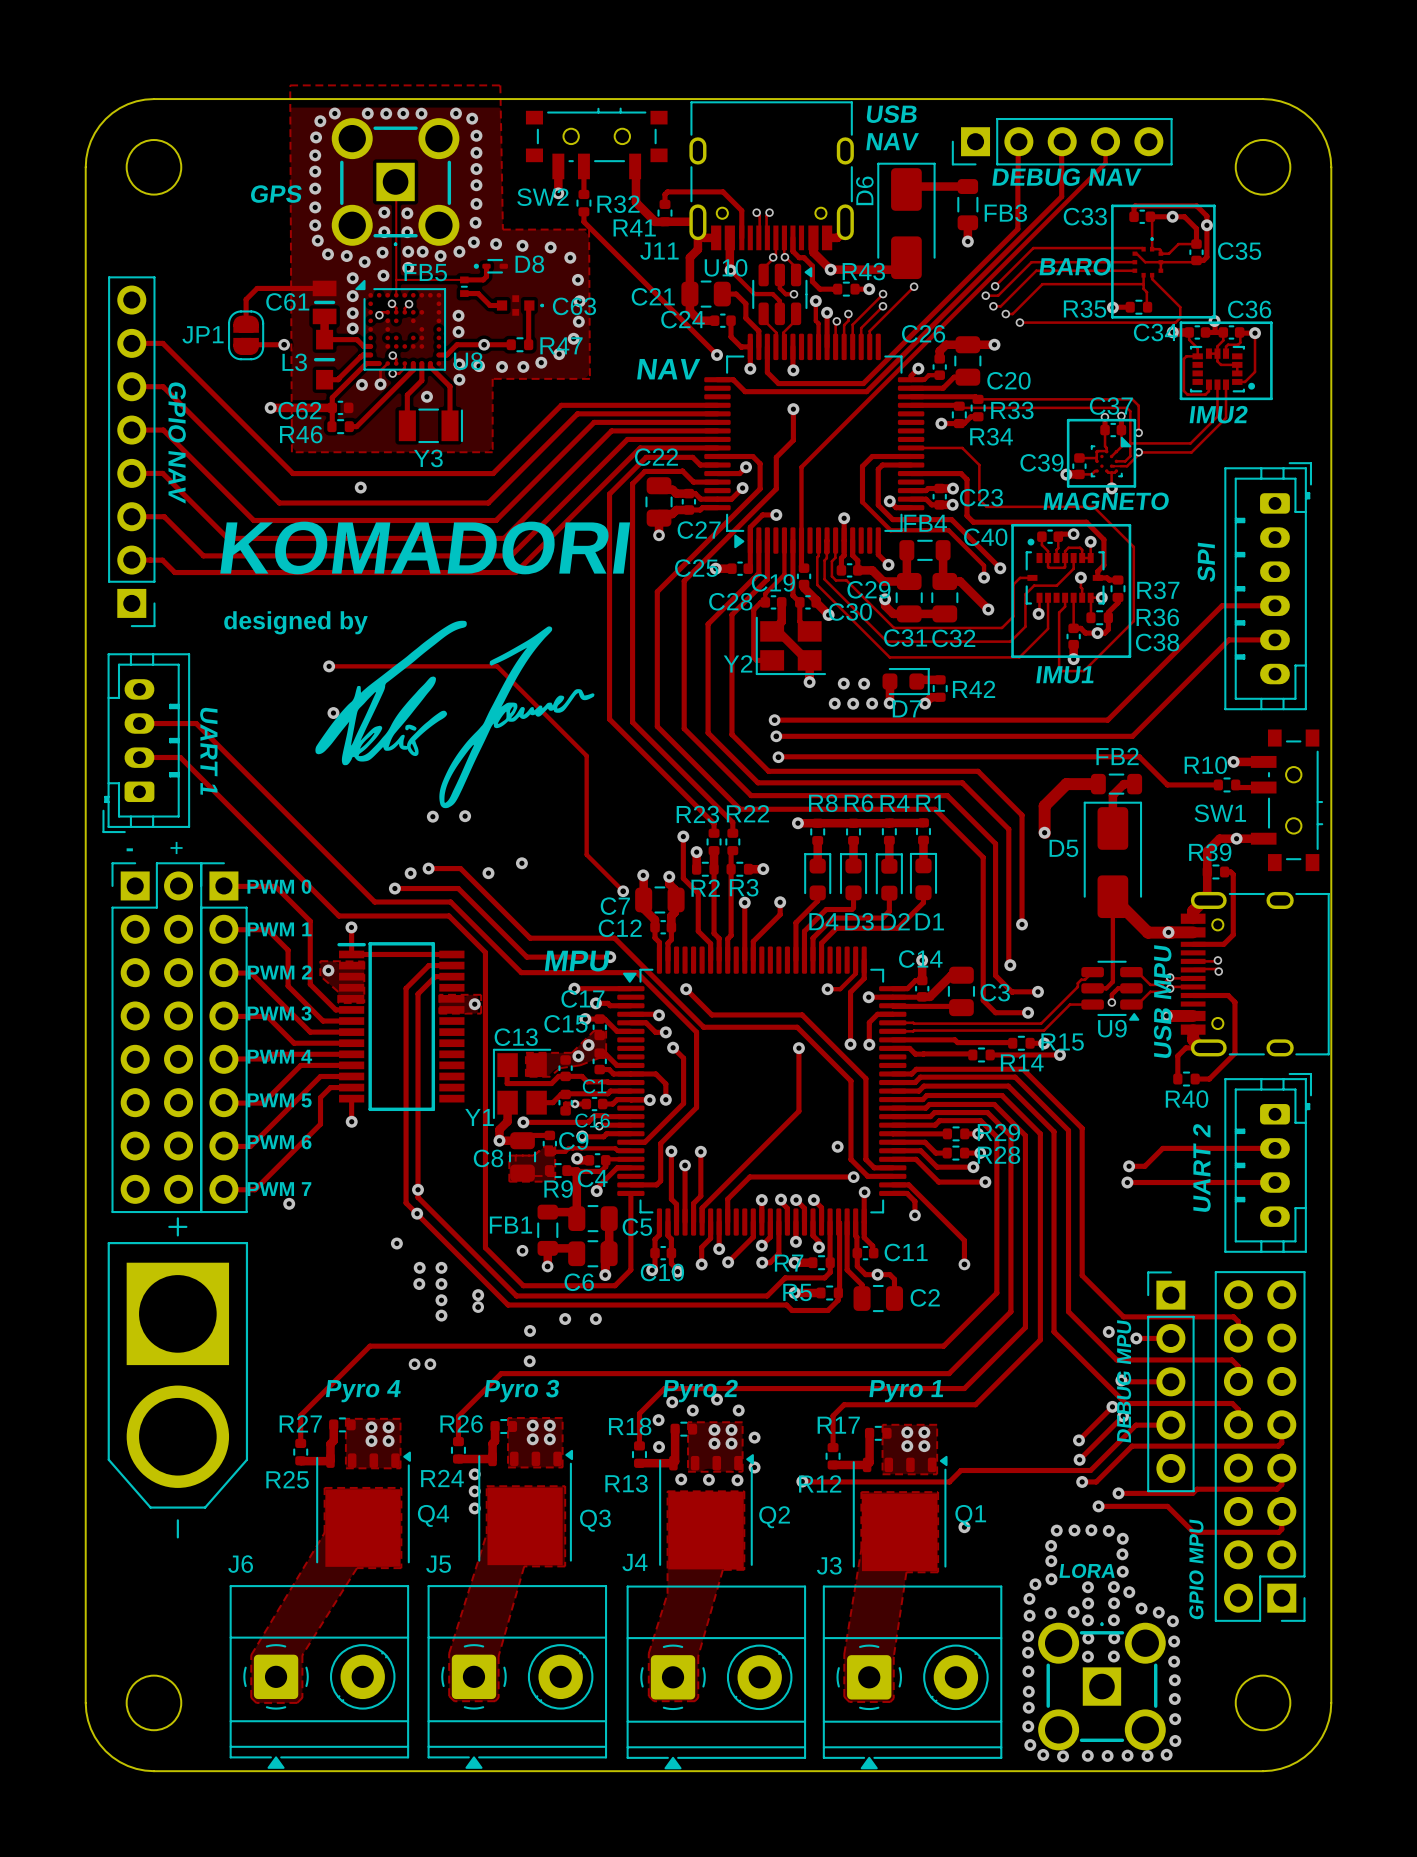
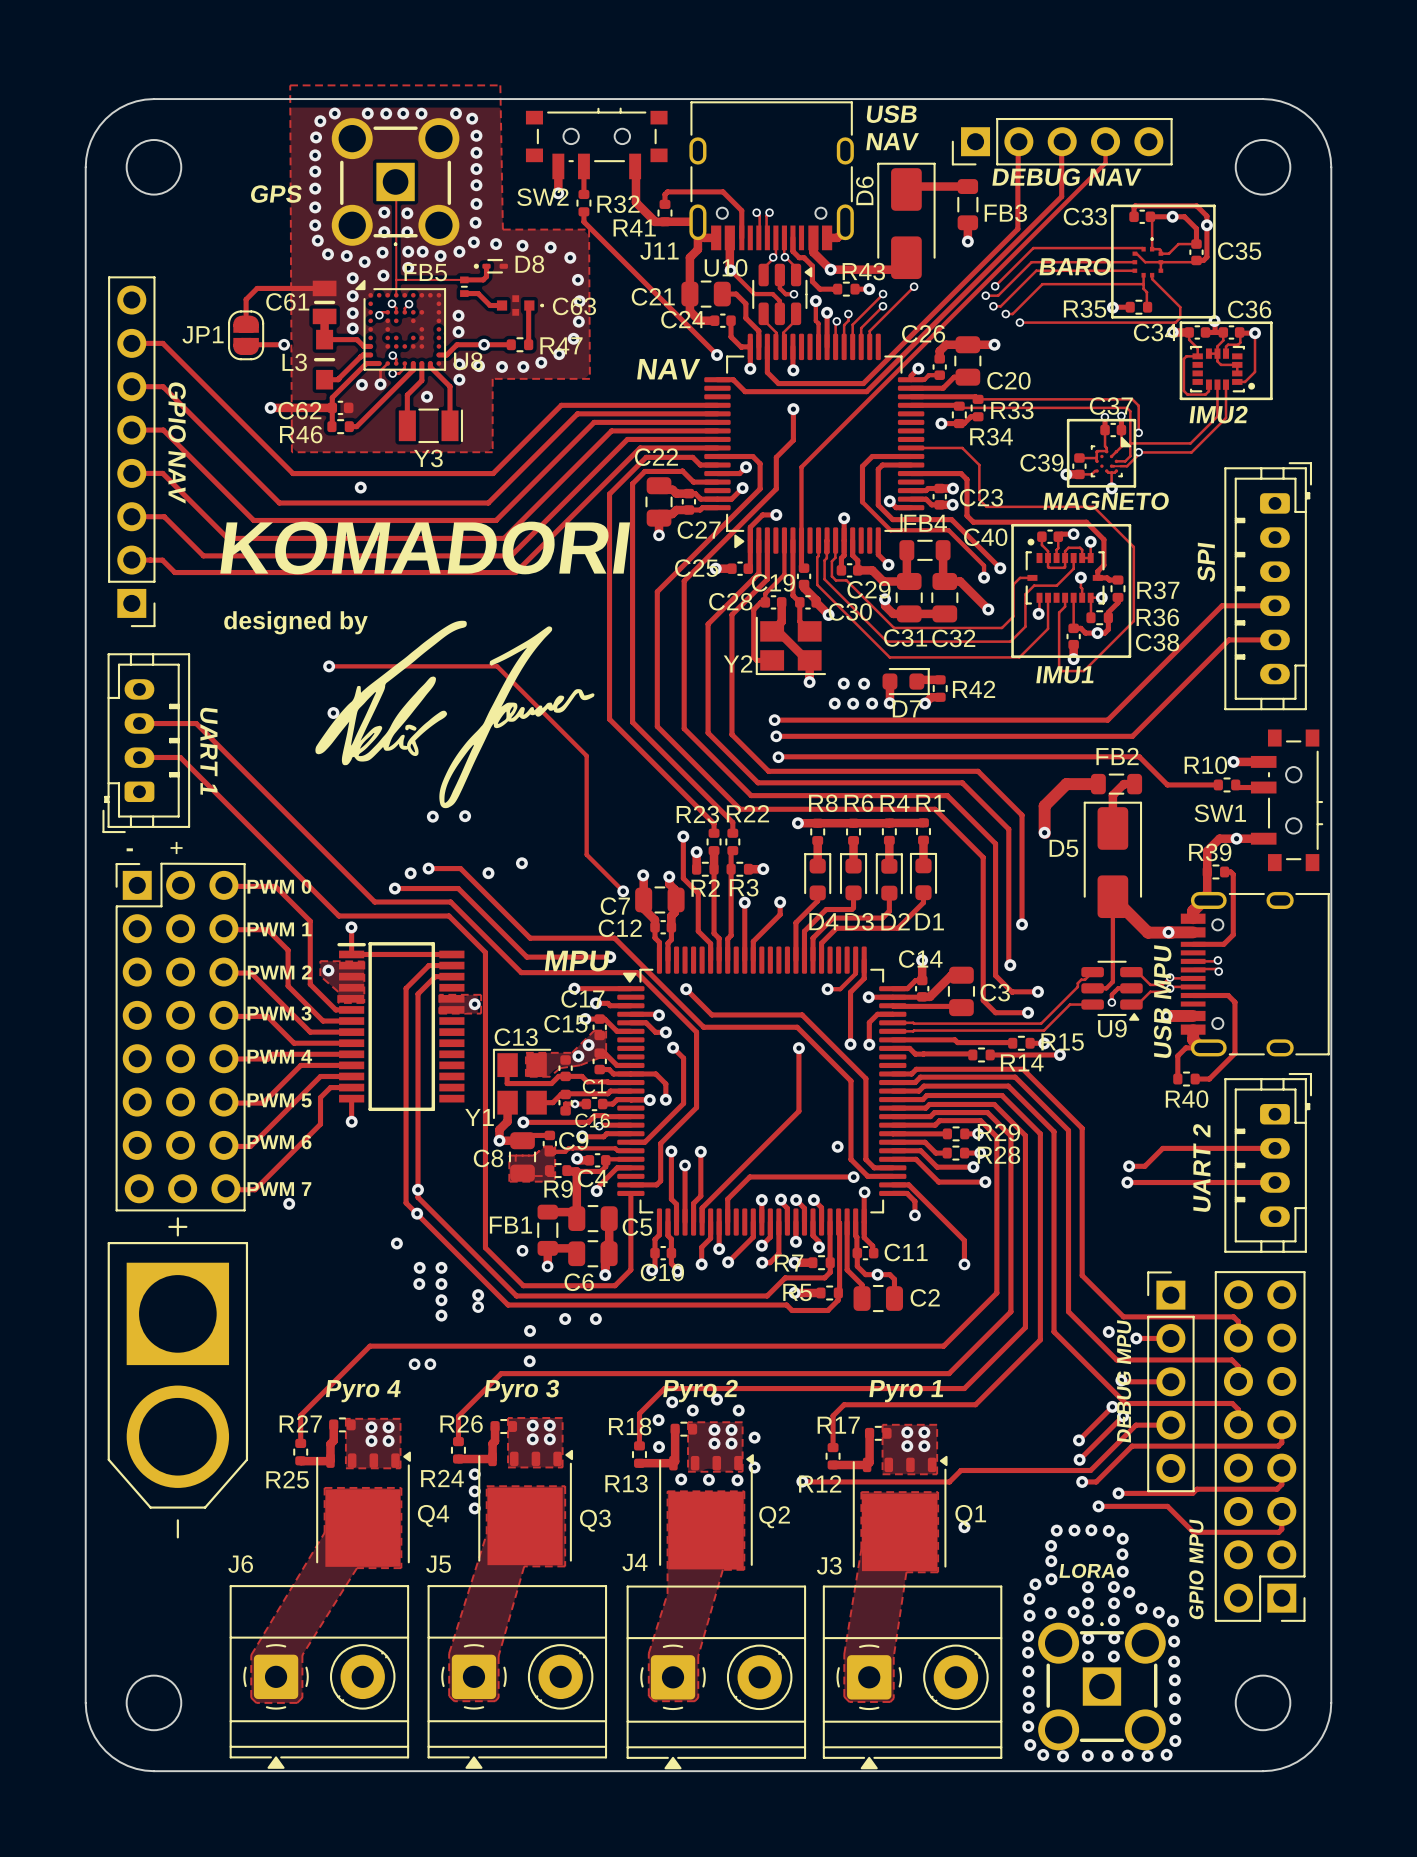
part: (156, 1037) -> none
part: none -> (180, 1037)
part: (223, 1037) -> none

